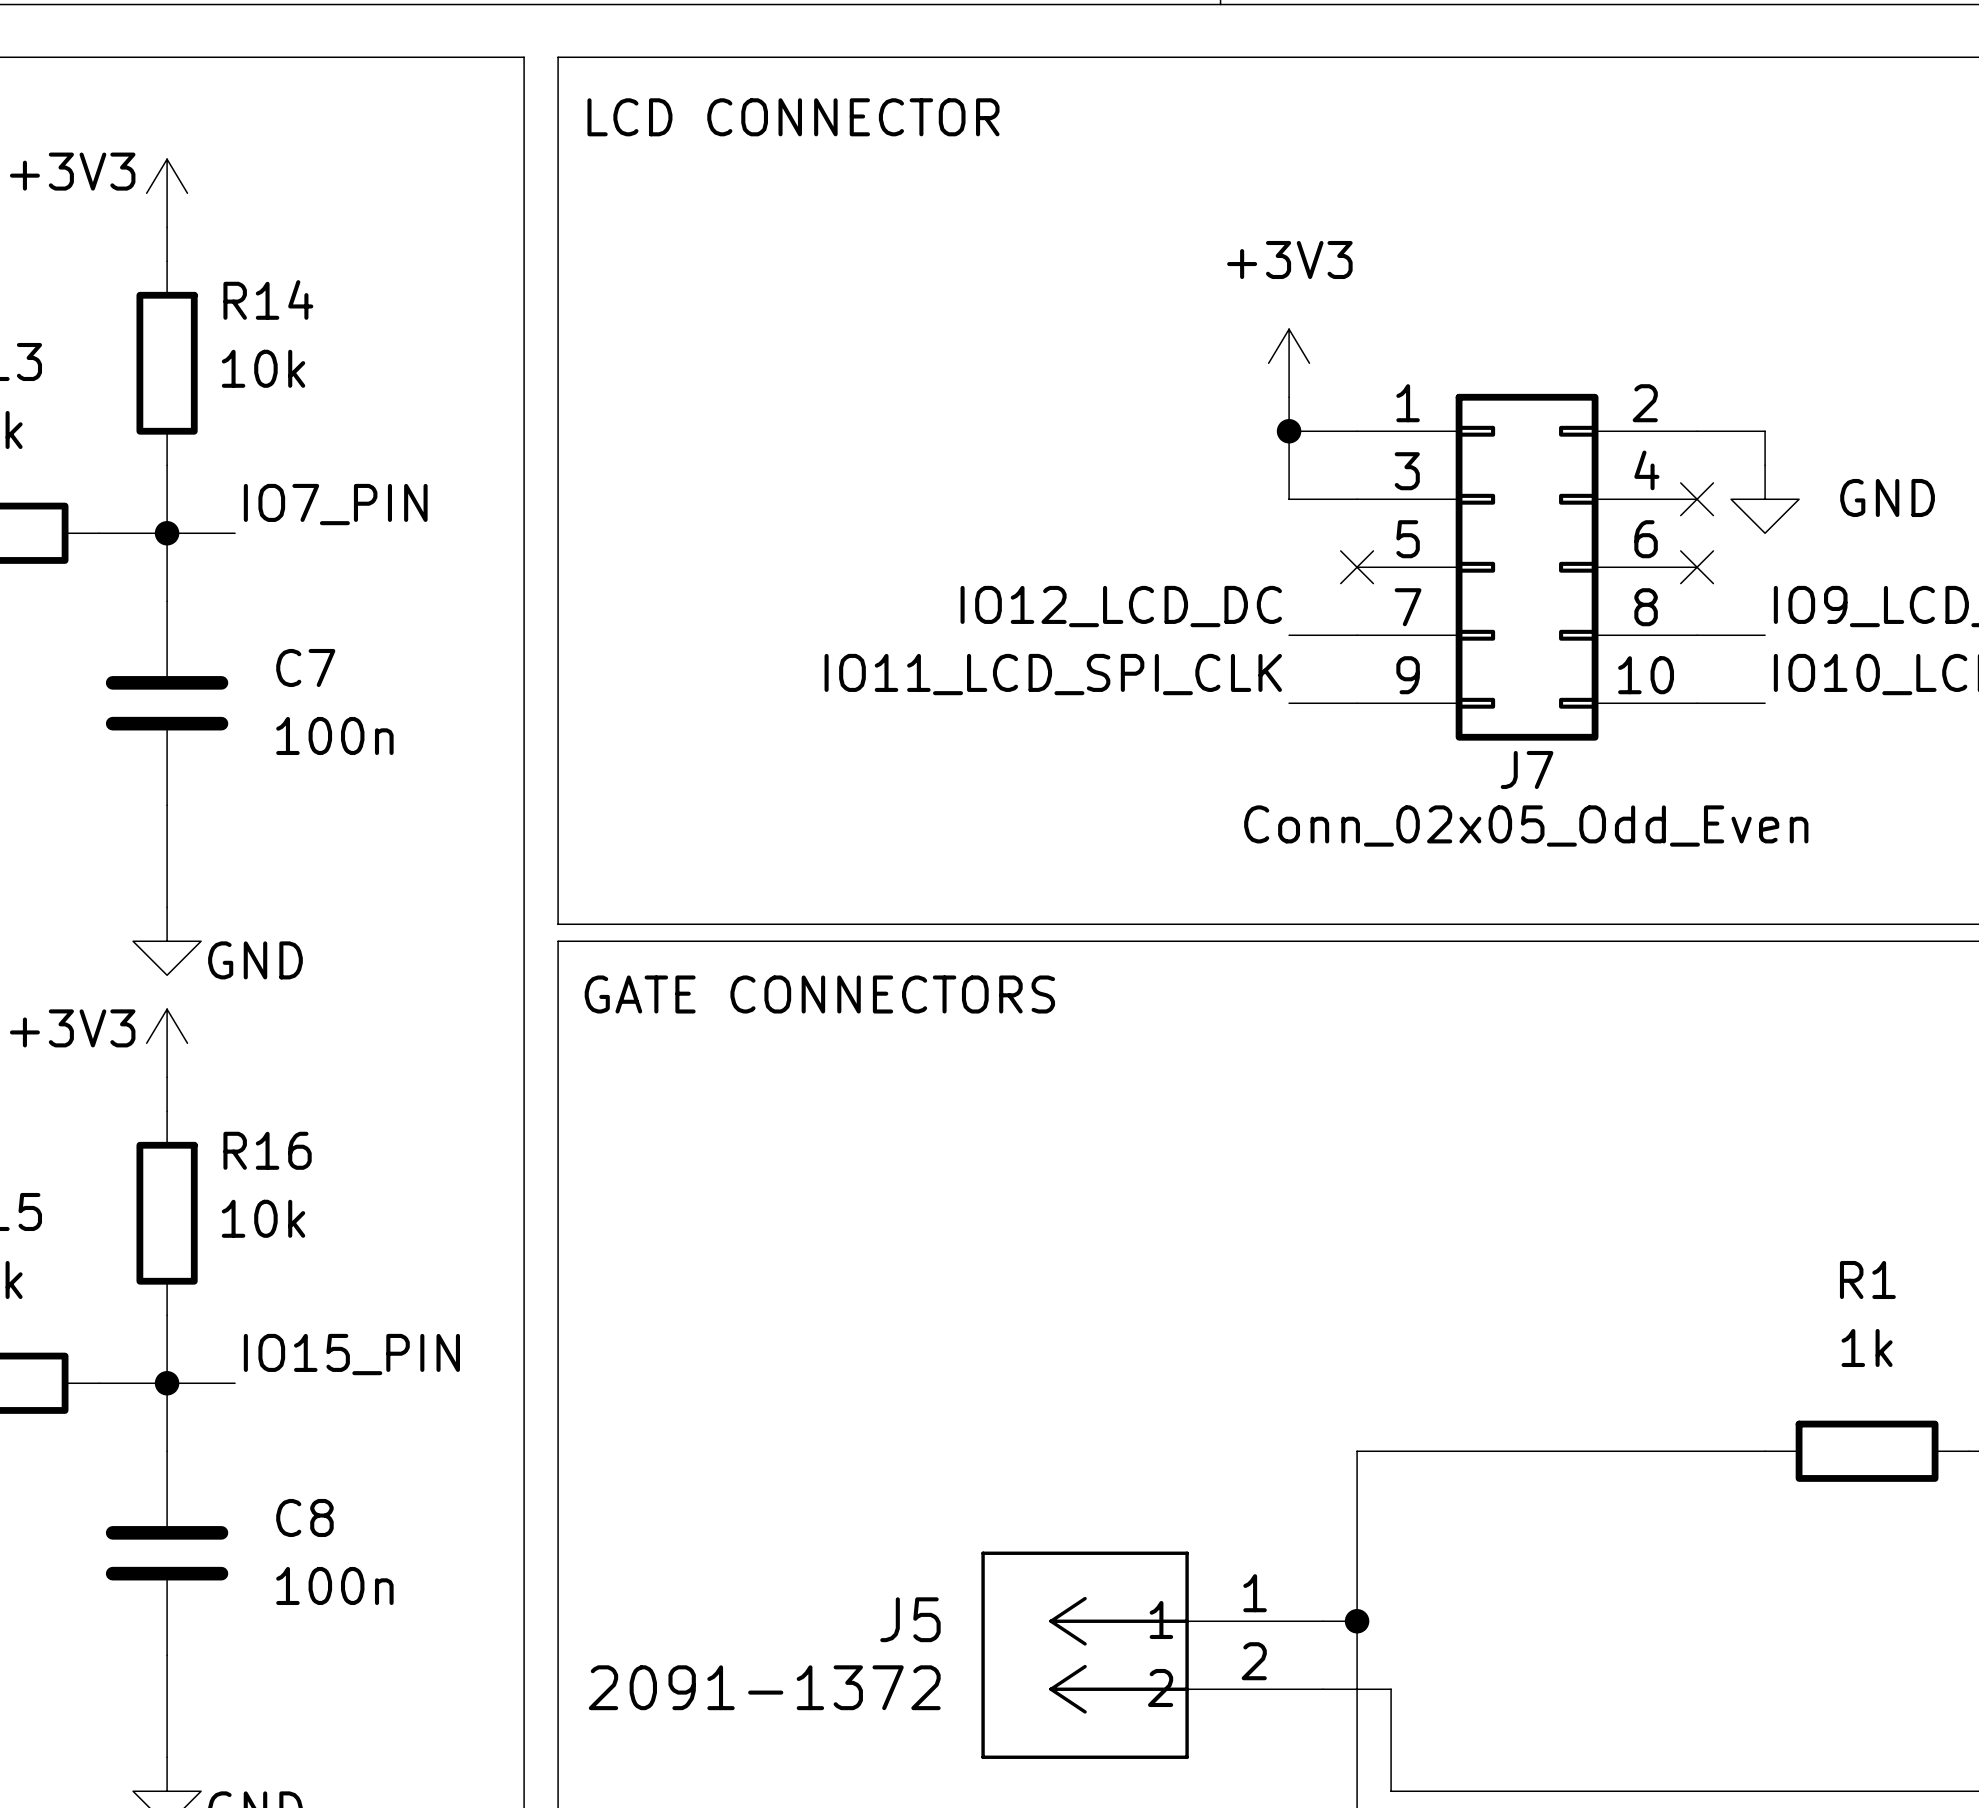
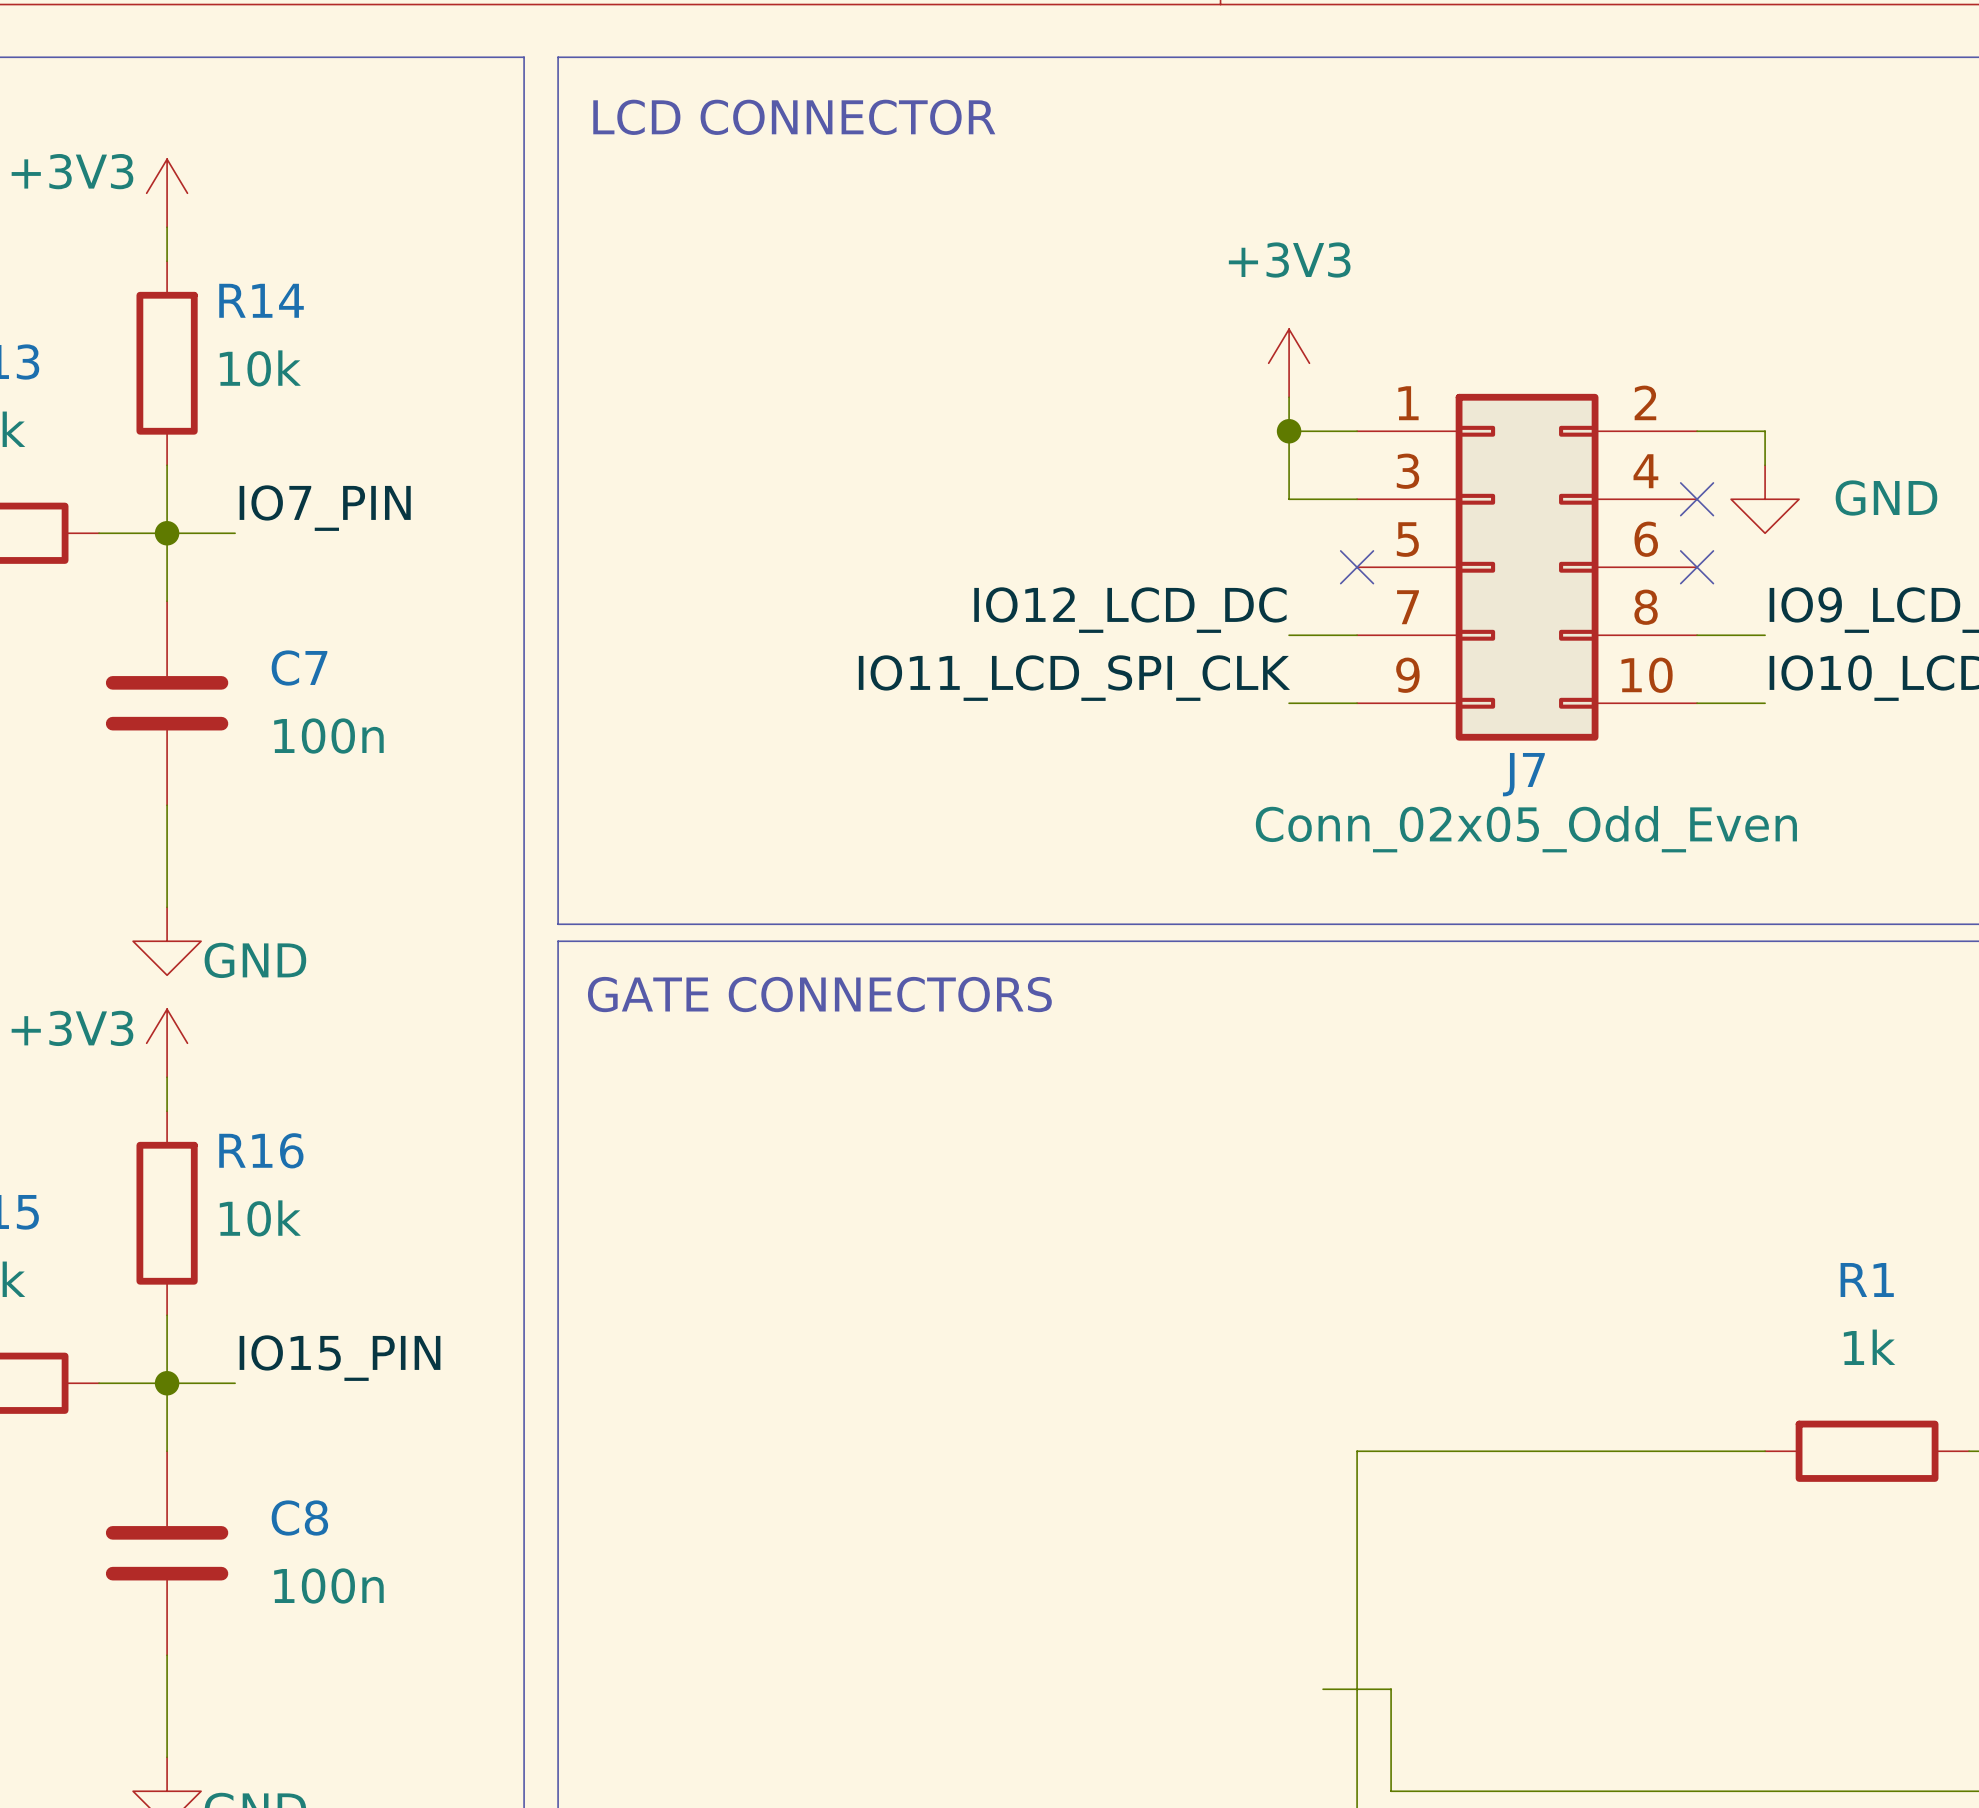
wire: (1323, 1621) (1357, 1621) -> none
junction: (1357, 1621) -> none
J5: 2091-1372 (1152, 1655) -> none

